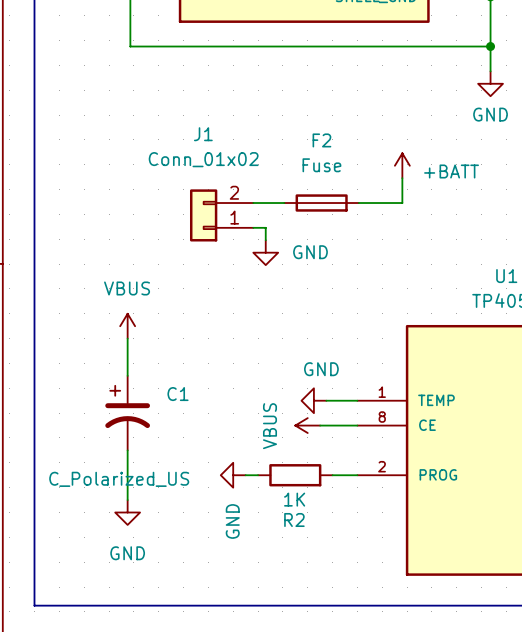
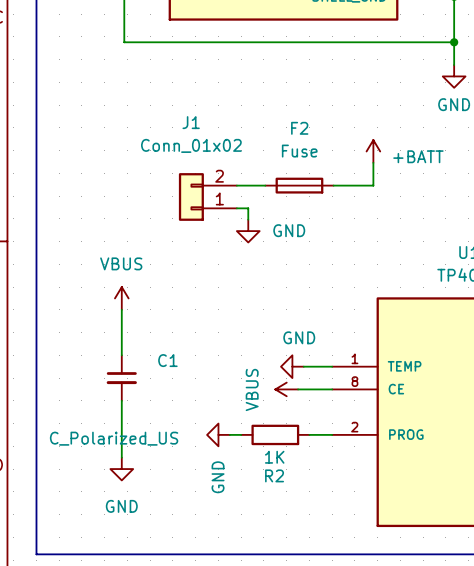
C1 symbol: [105, 375, 151, 451] -> [106, 355, 137, 401]

